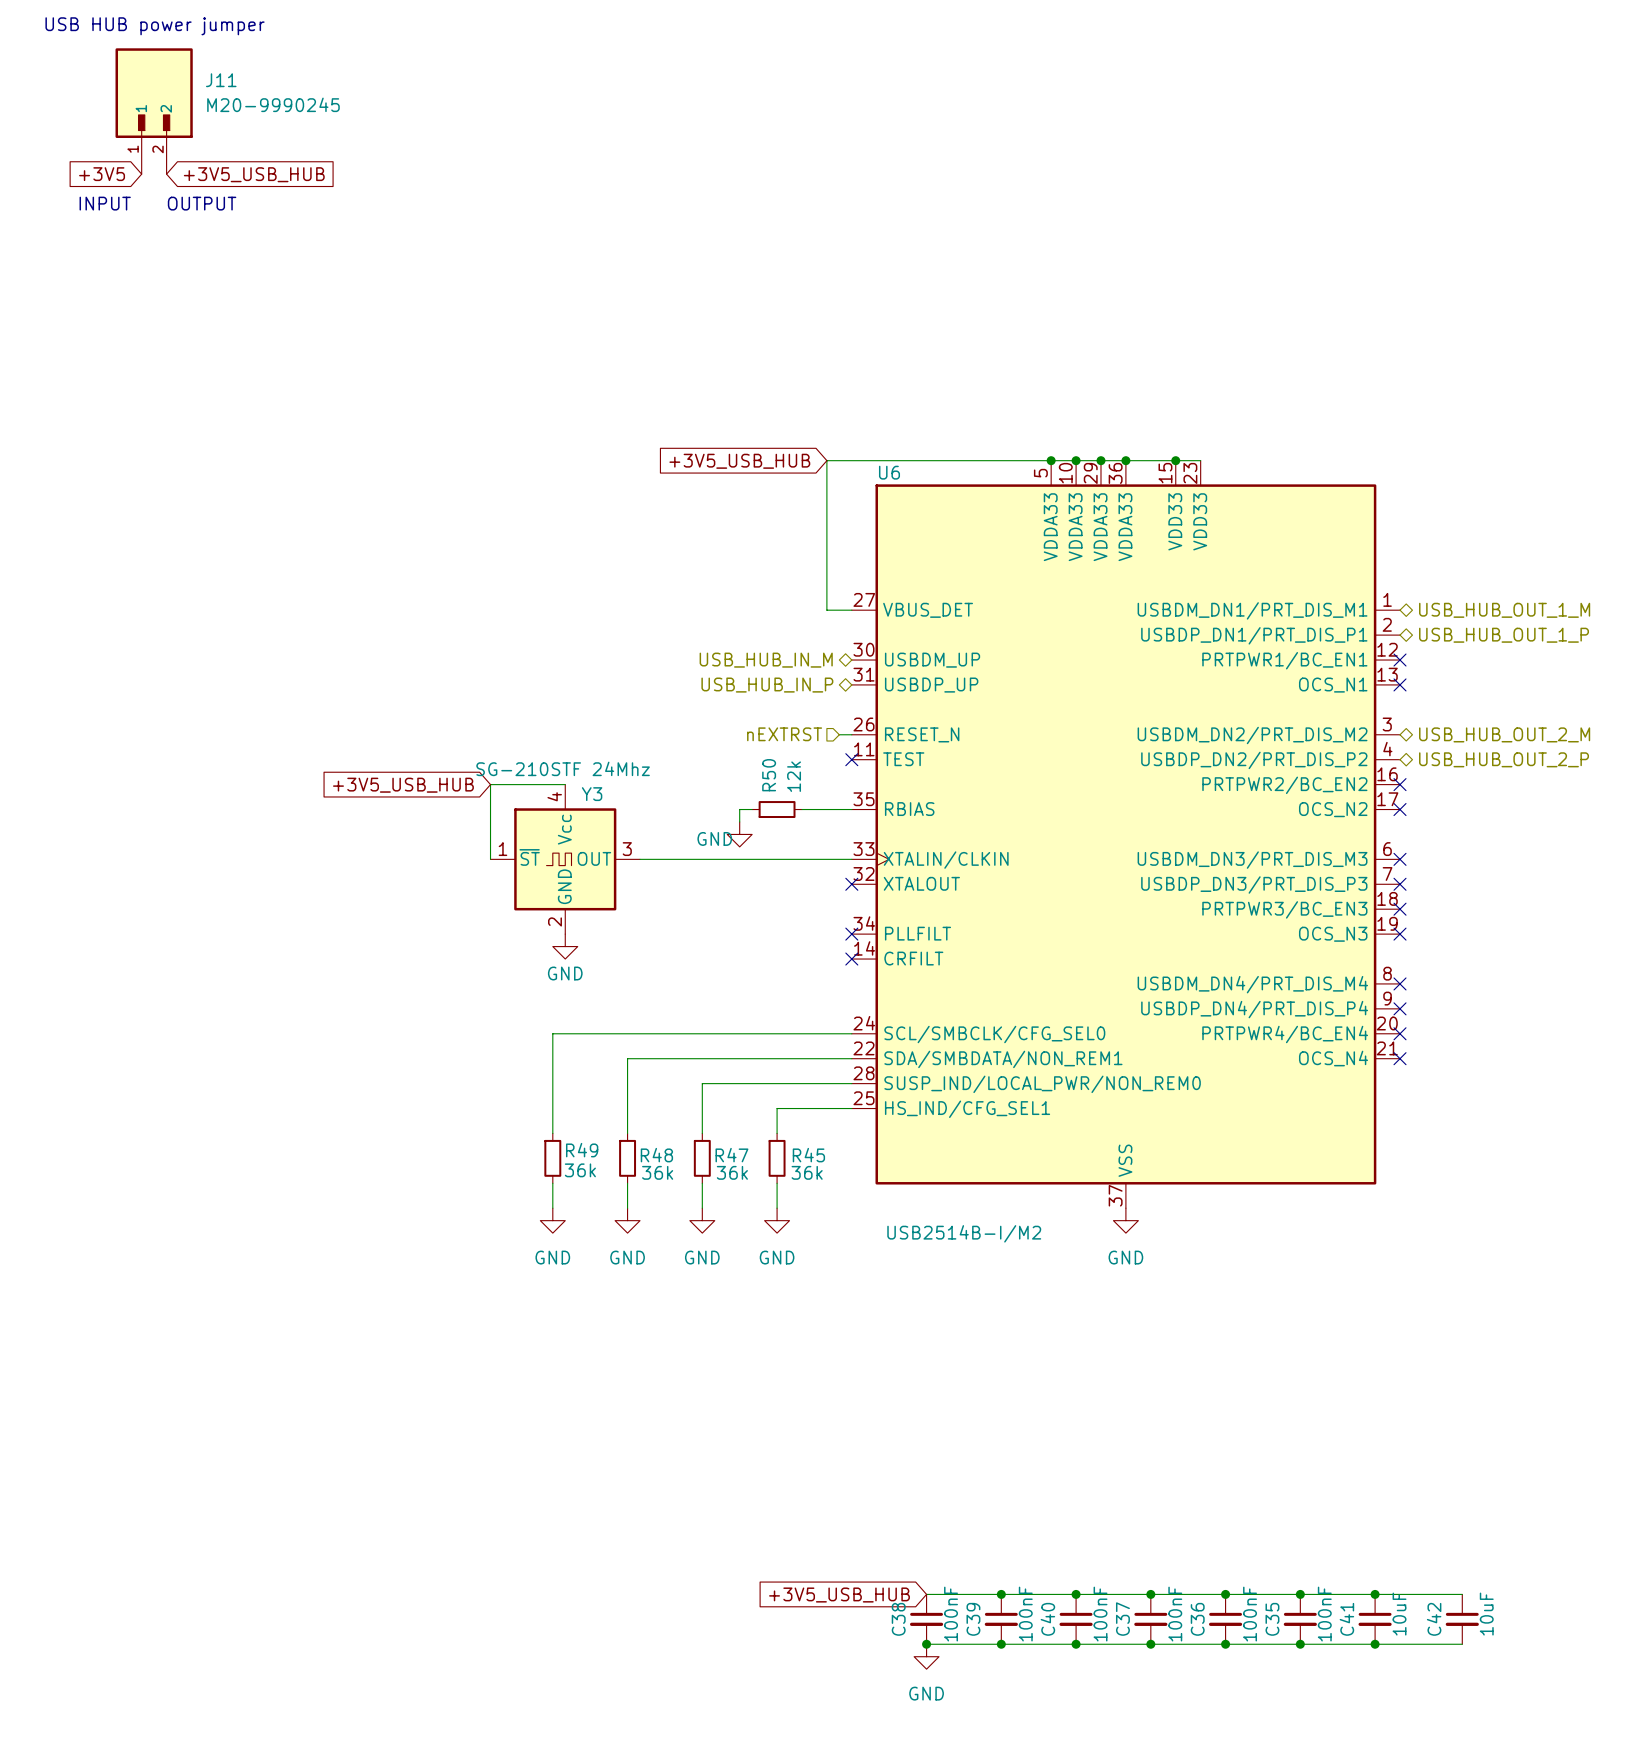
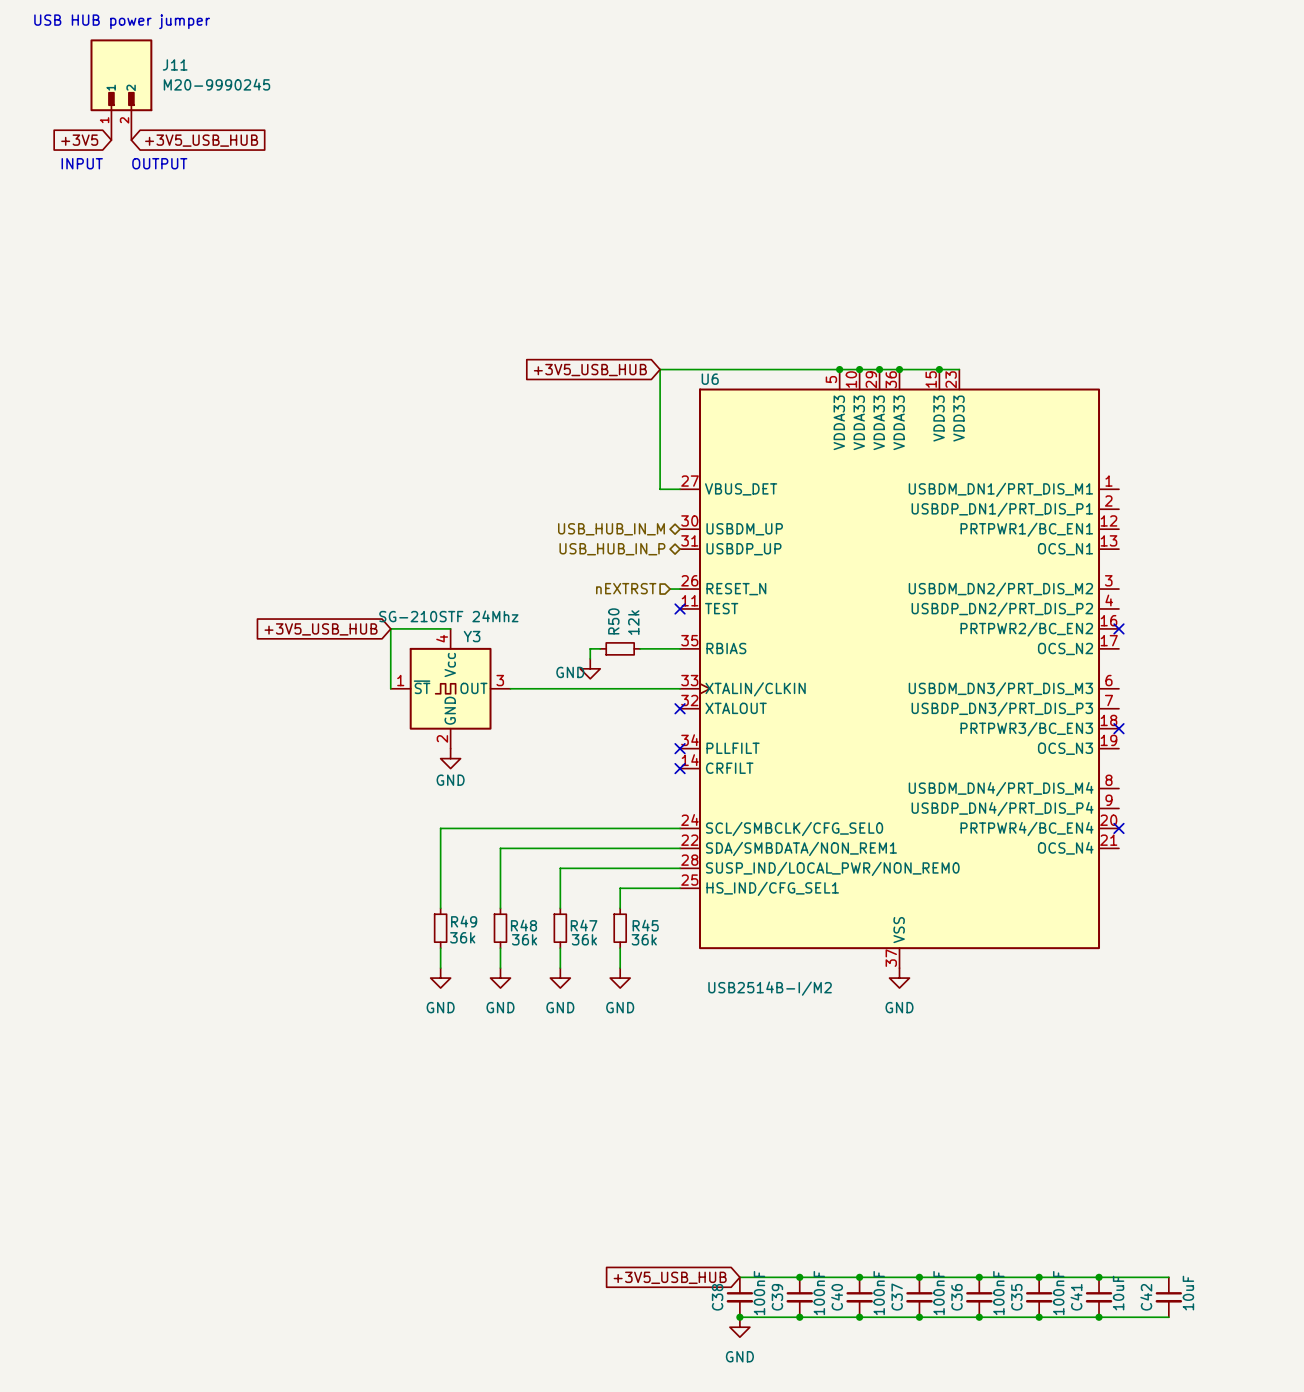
hierarchical label: USB_HUB_OUT_1_M (1504, 610) -> none
hierarchical label: USB_HUB_OUT_1_P (1504, 635) -> none
no-connect mark: (1400, 660) -> none
no-connect mark: (1400, 684) -> none
hierarchical label: USB_HUB_OUT_2_M (1504, 734) -> none
hierarchical label: USB_HUB_OUT_2_P (1504, 759) -> none
no-connect mark: (1400, 809) -> none
no-connect mark: (1400, 859) -> none
no-connect mark: (1400, 884) -> none
no-connect mark: (1400, 934) -> none
no-connect mark: (1400, 983) -> none
no-connect mark: (1400, 1008) -> none
no-connect mark: (1400, 1058) -> none

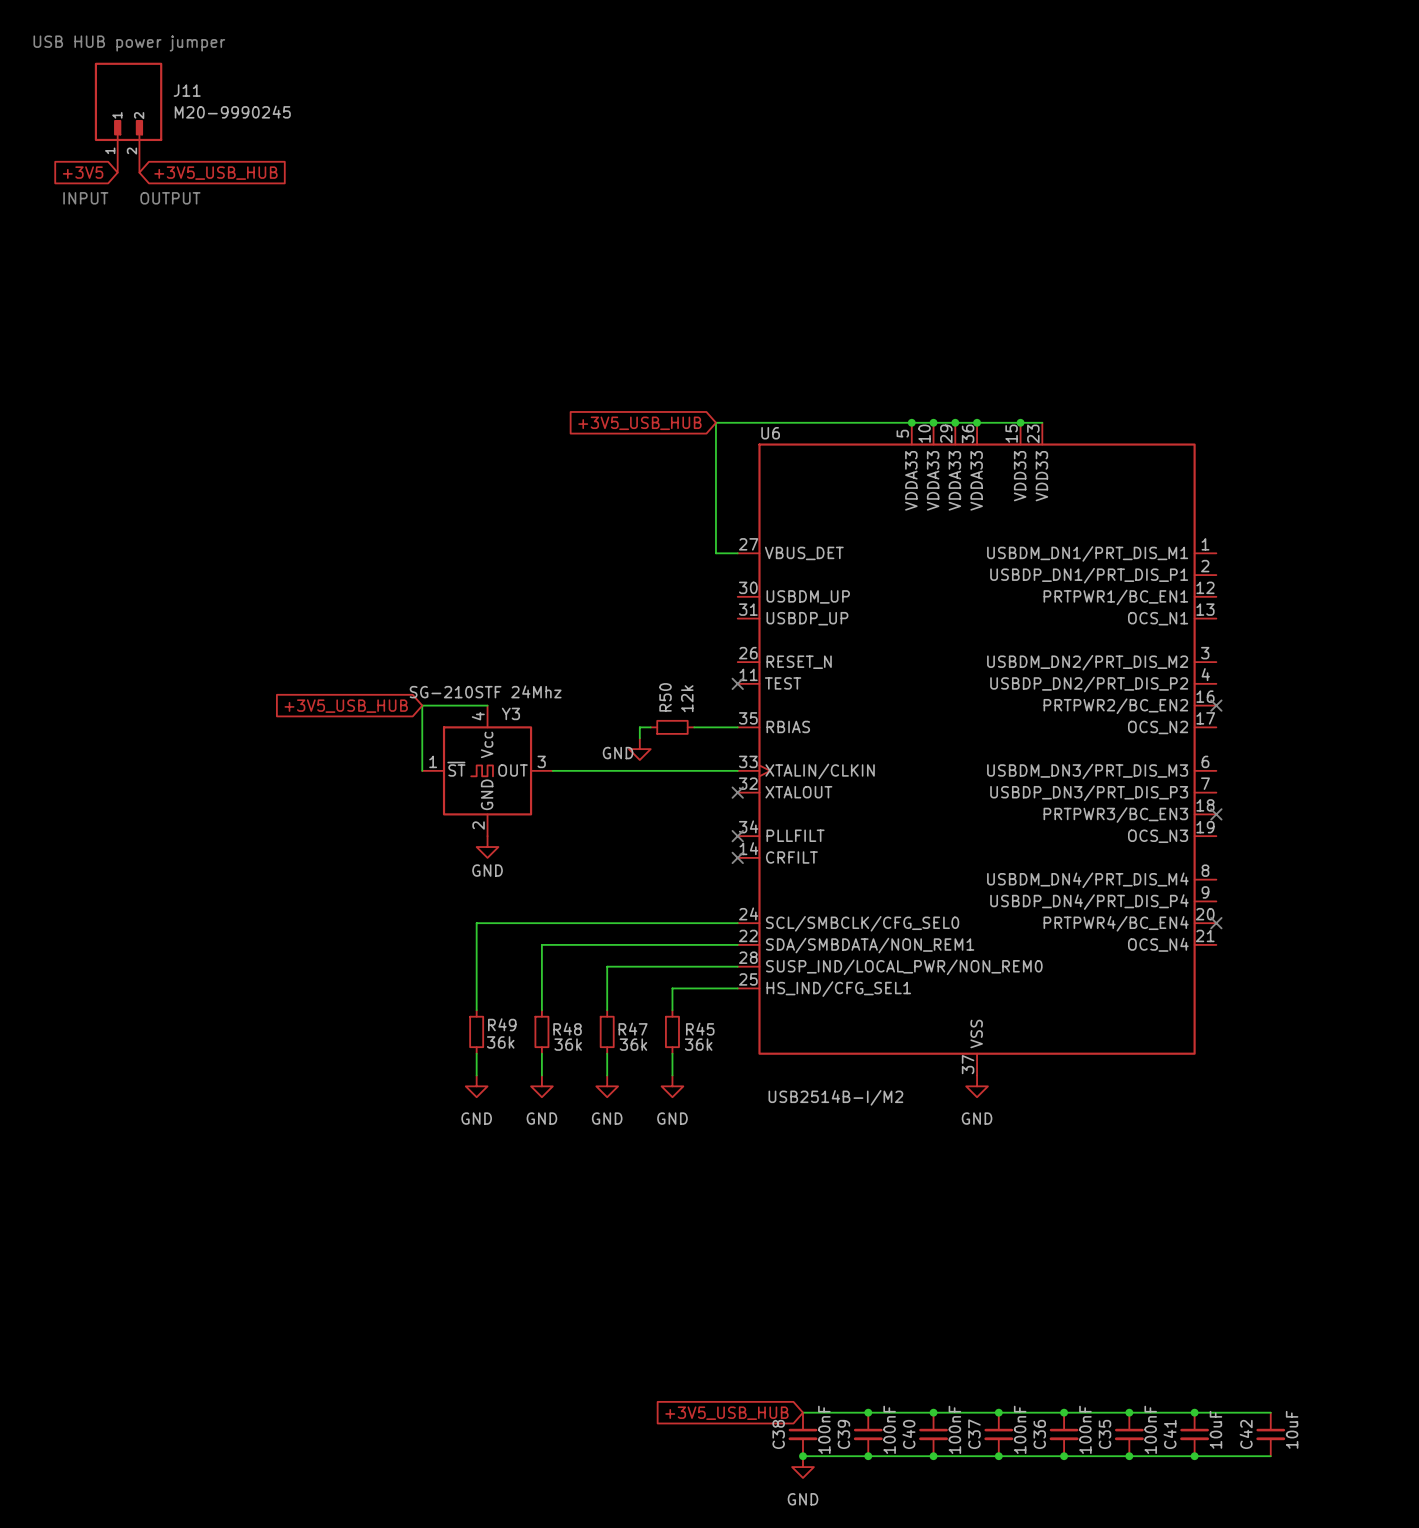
hierarchical label: USB_HUB_IN_M (611, 529) -> none
hierarchical label: USB_HUB_IN_P (612, 549) -> none
hierarchical label: nEXTRST (626, 588) -> none
wire: (670, 589) (680, 589) -> none

